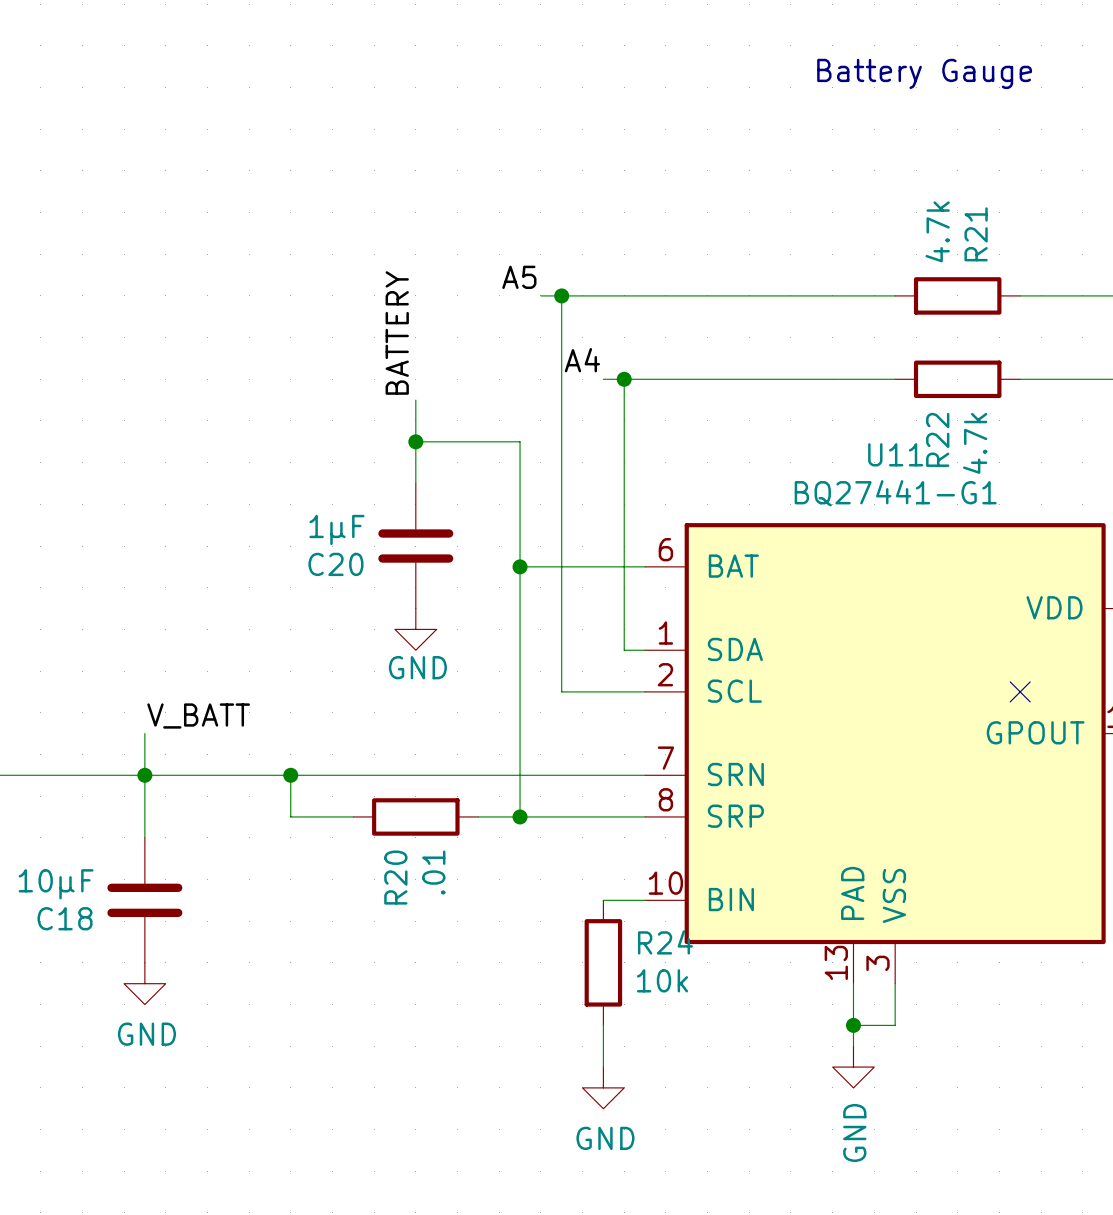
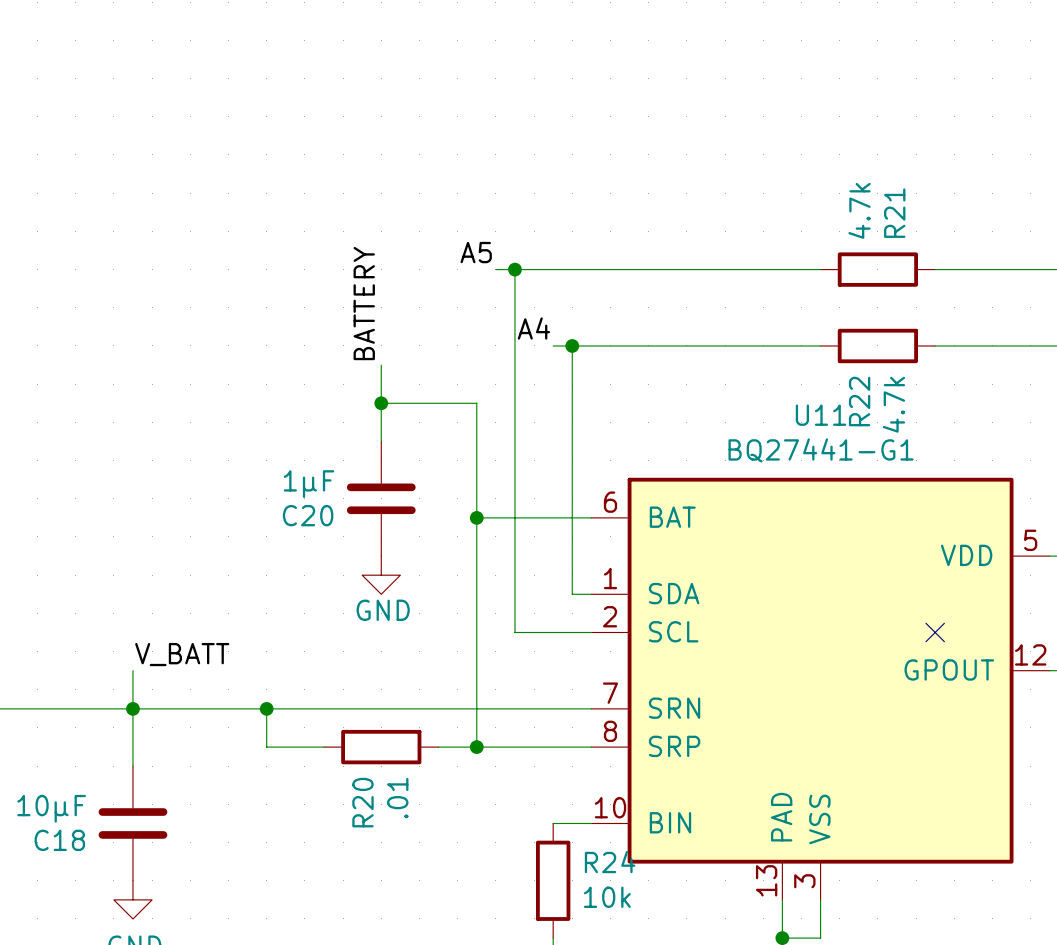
text: Battery Gauge (924, 73) -> none

